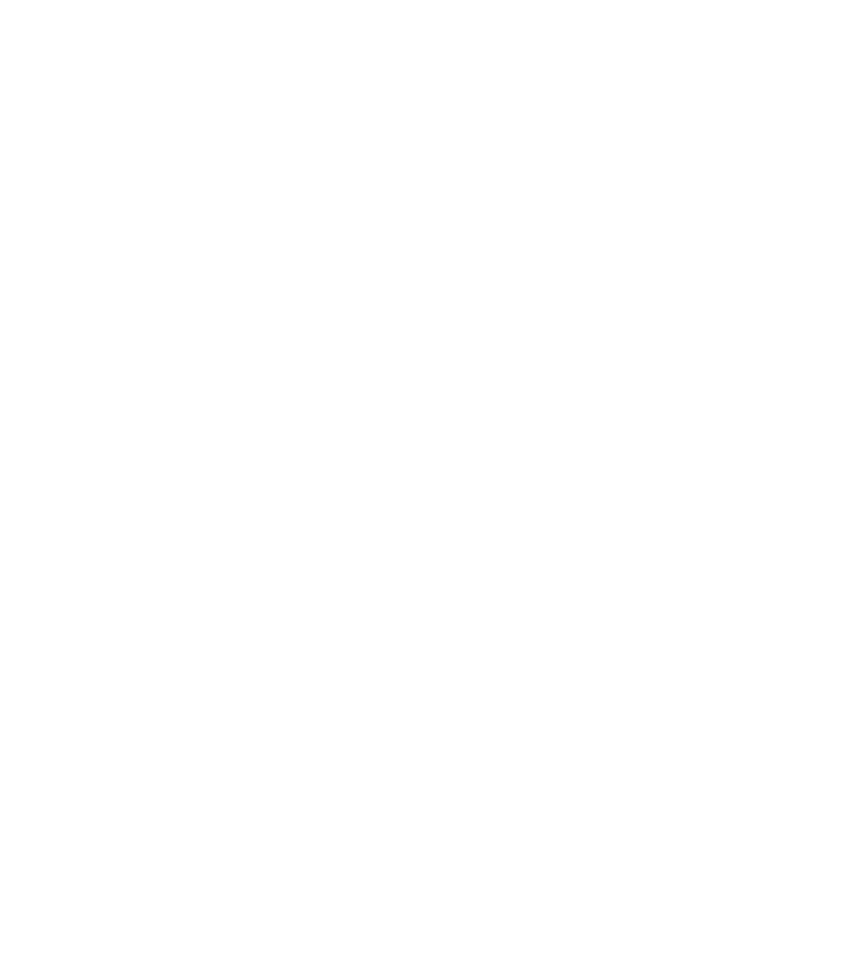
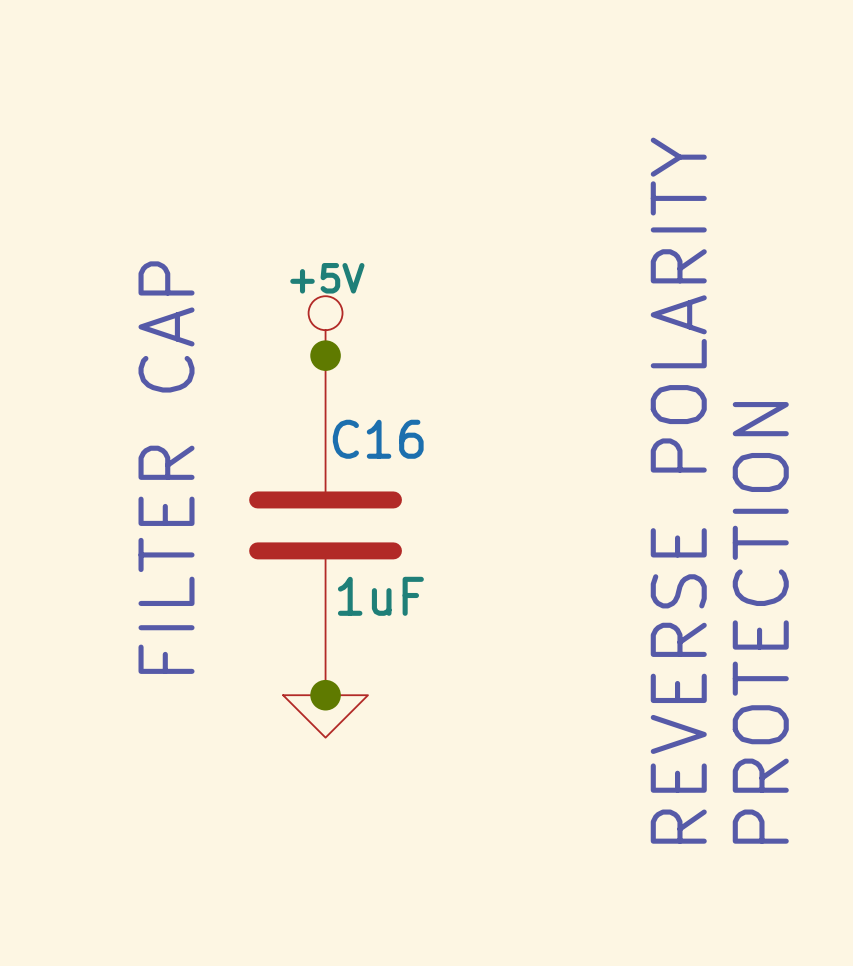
power symbol: none -> +5V (325, 325)
junction: none -> (325, 355)
text: none -> FILTER CAP (166, 467)
text: none -> REVERSE POLARITY (678, 490)
C16: none -> 1uF (325, 525)
text: none -> PROTECTION (760, 622)
junction: none -> (325, 695)
power symbol: none -> (325, 716)

